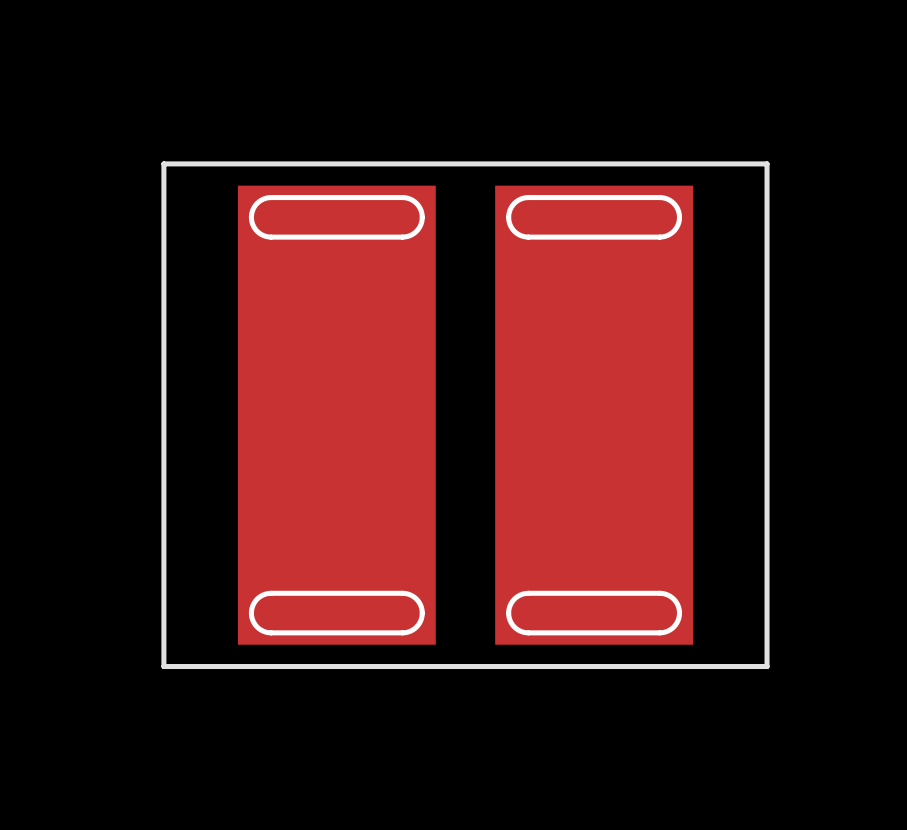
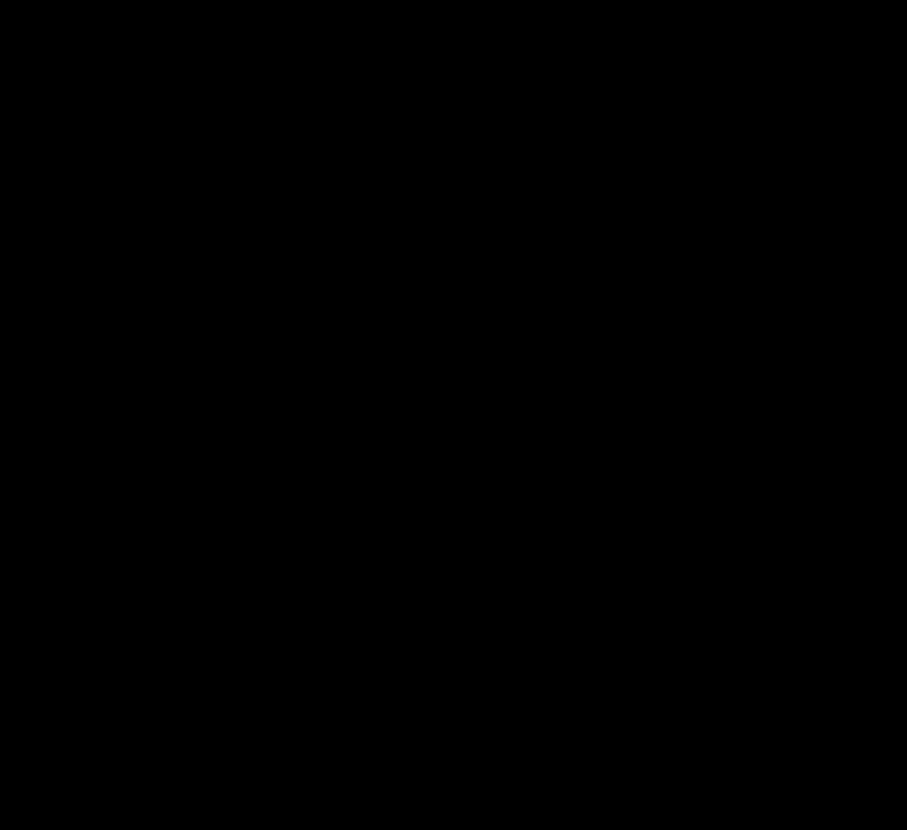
part: (465, 415) -> none

